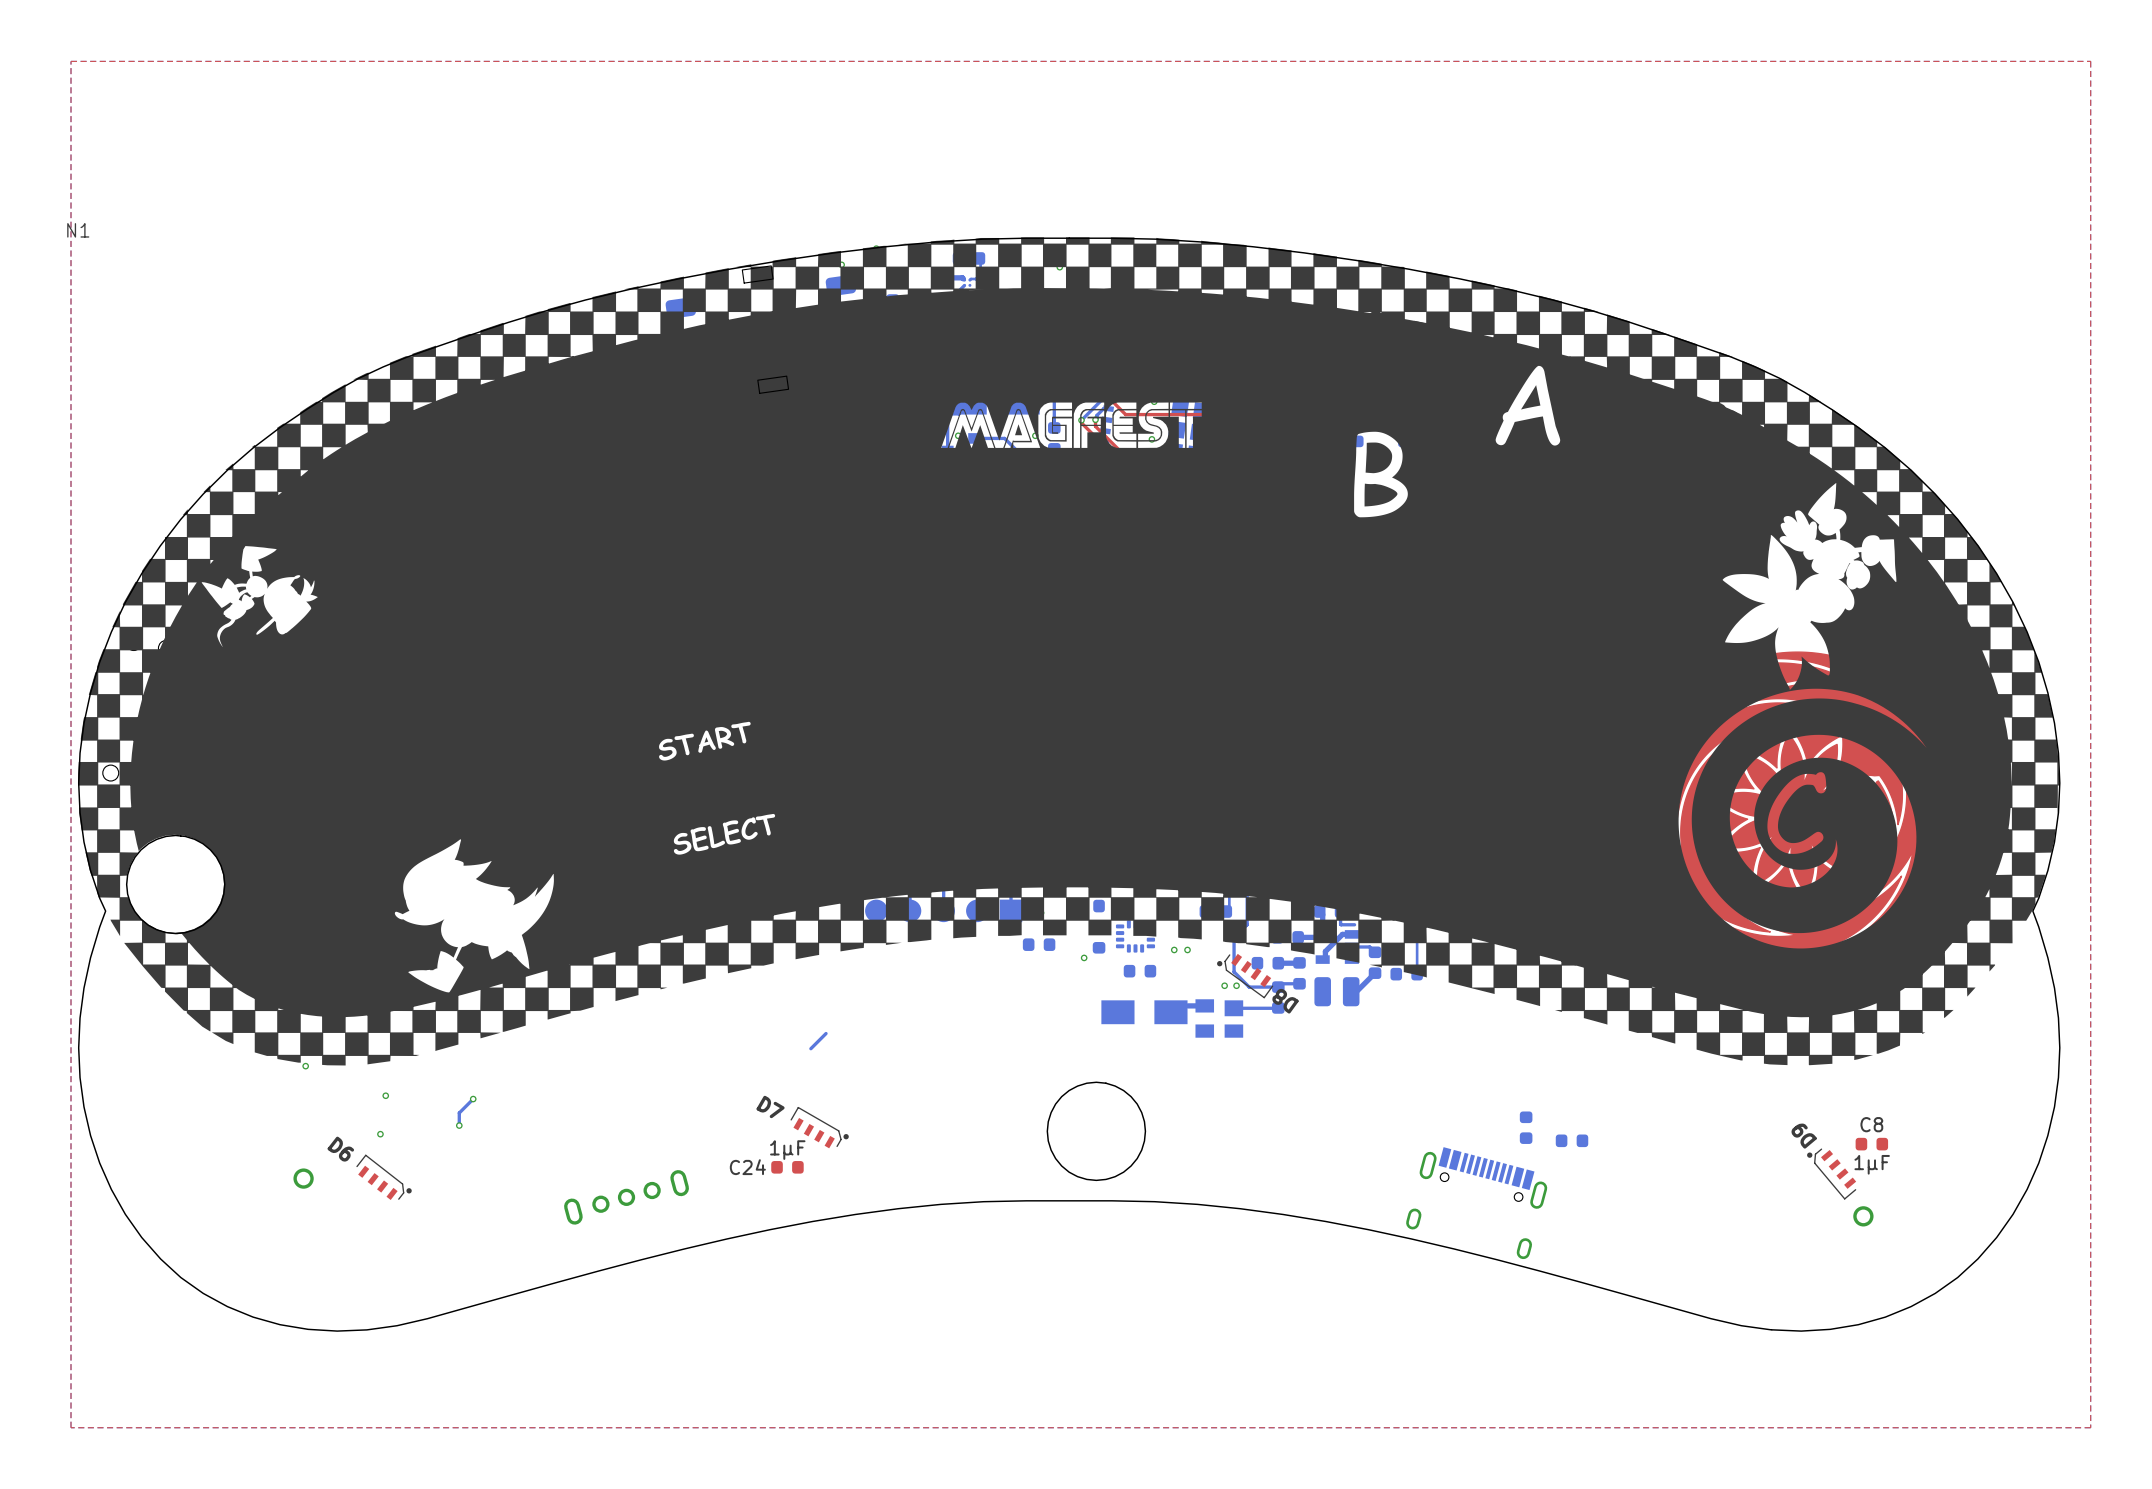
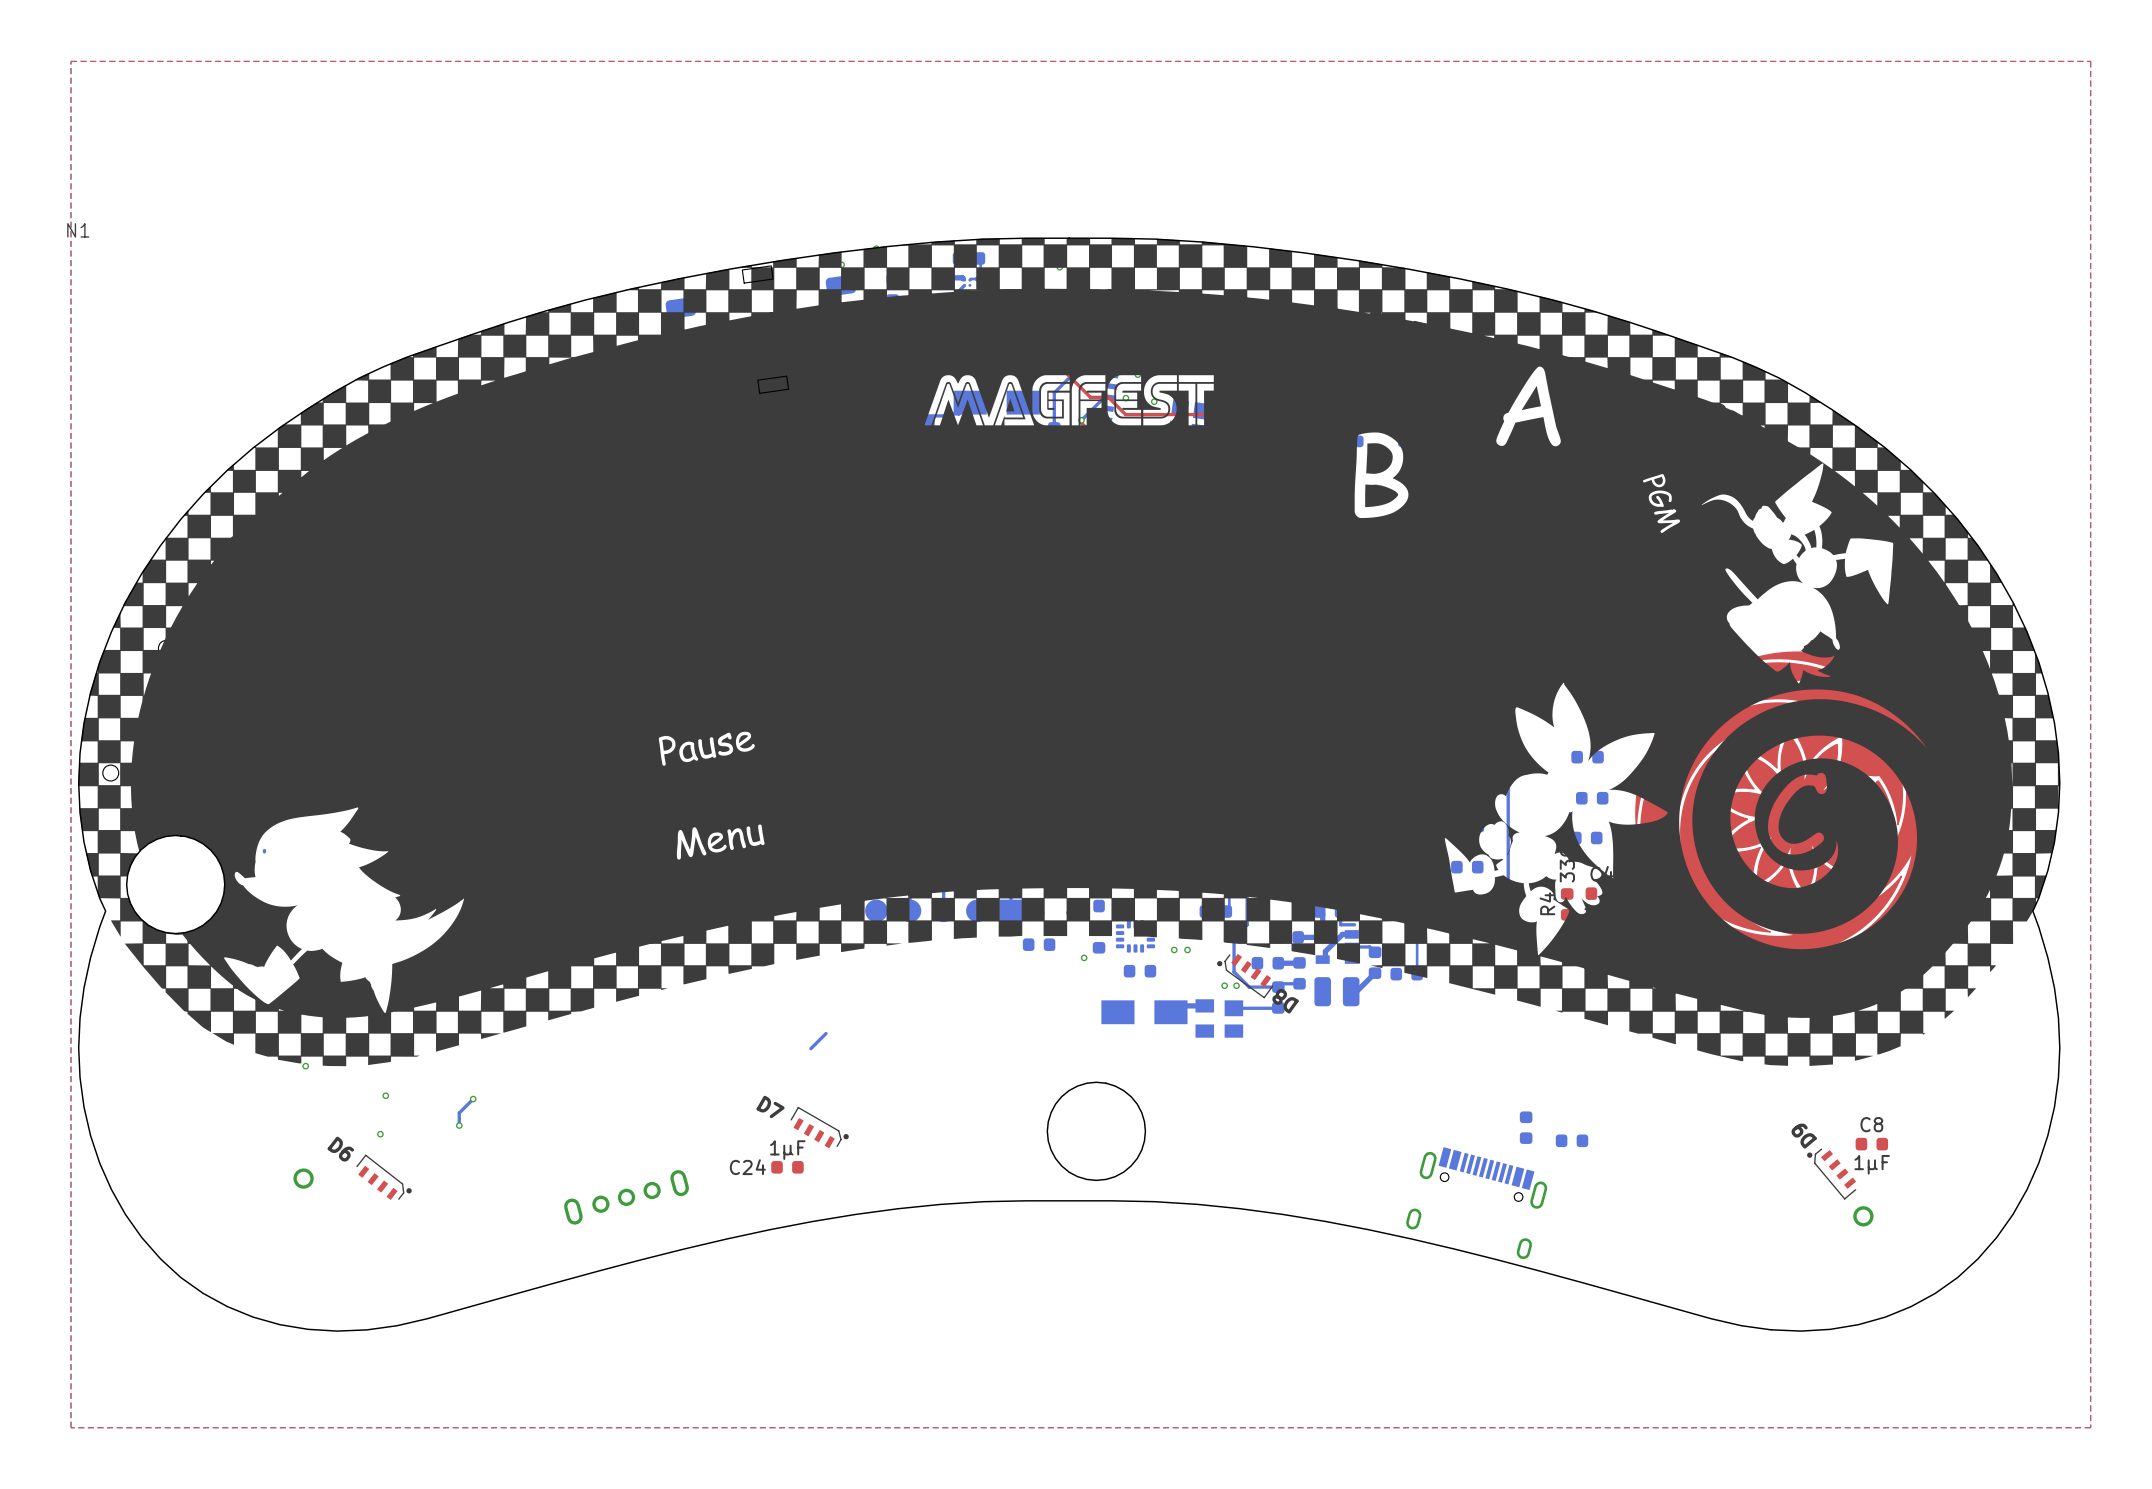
N1 footprint: [77, 237, 2061, 1332] -> [77, 237, 2061, 1332]

